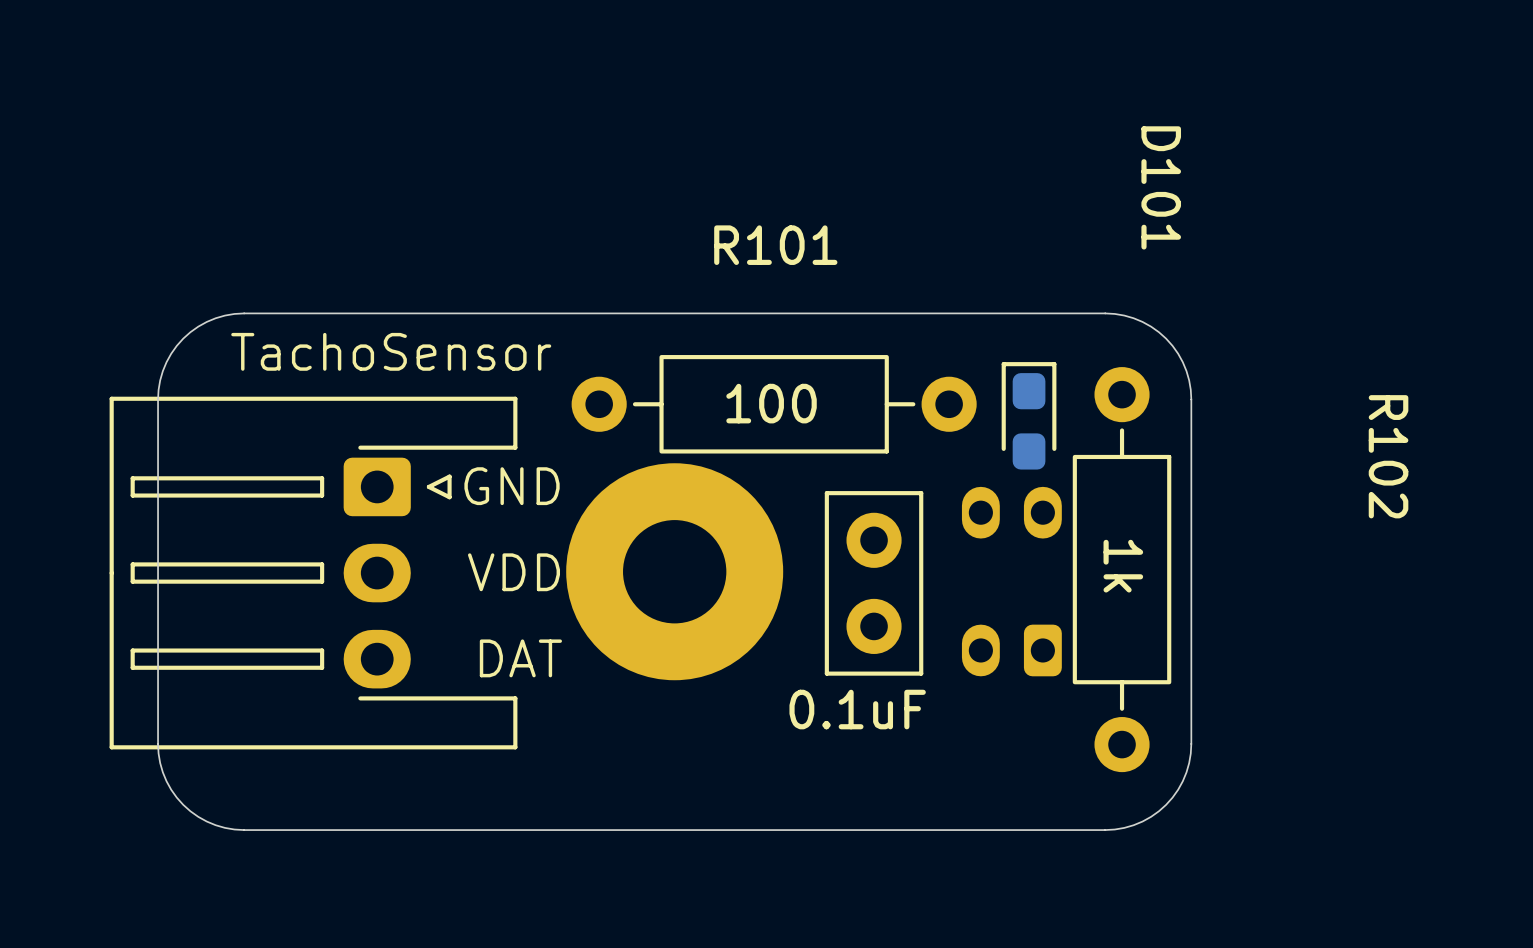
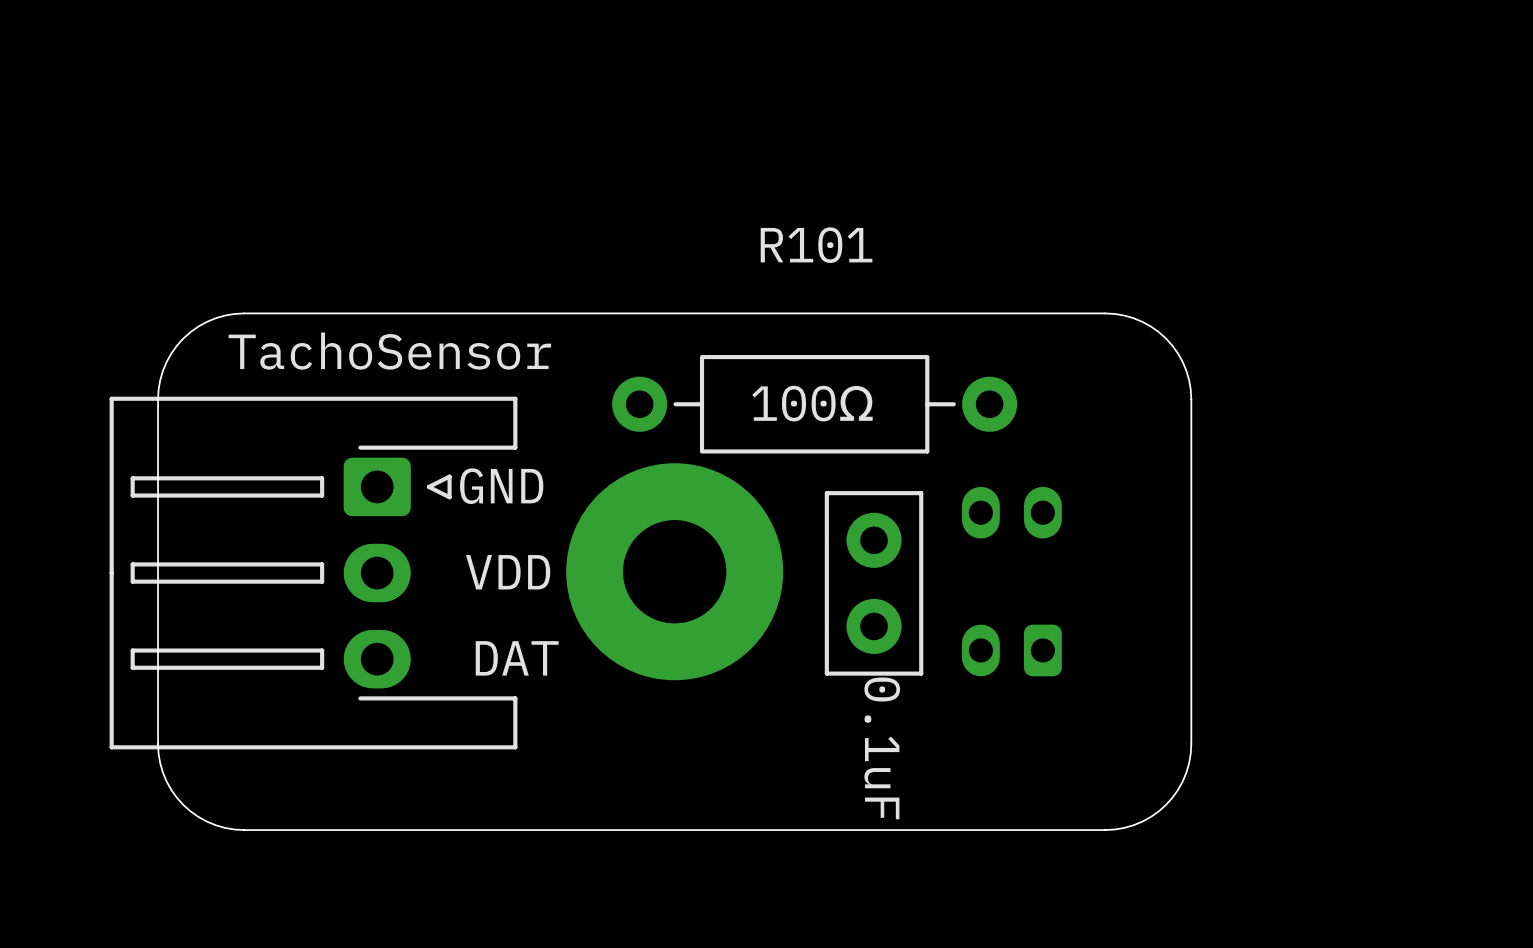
R101 value: 100 (771, 403) -> 100Ω (812, 403)
R101 position: (774, 404) -> (814, 404)
D101: (1029, 415) -> none
R102: 1k (1122, 569) -> none
0.1uF name rotation: 0° (857, 709) -> 90° clockwise (882, 748)

